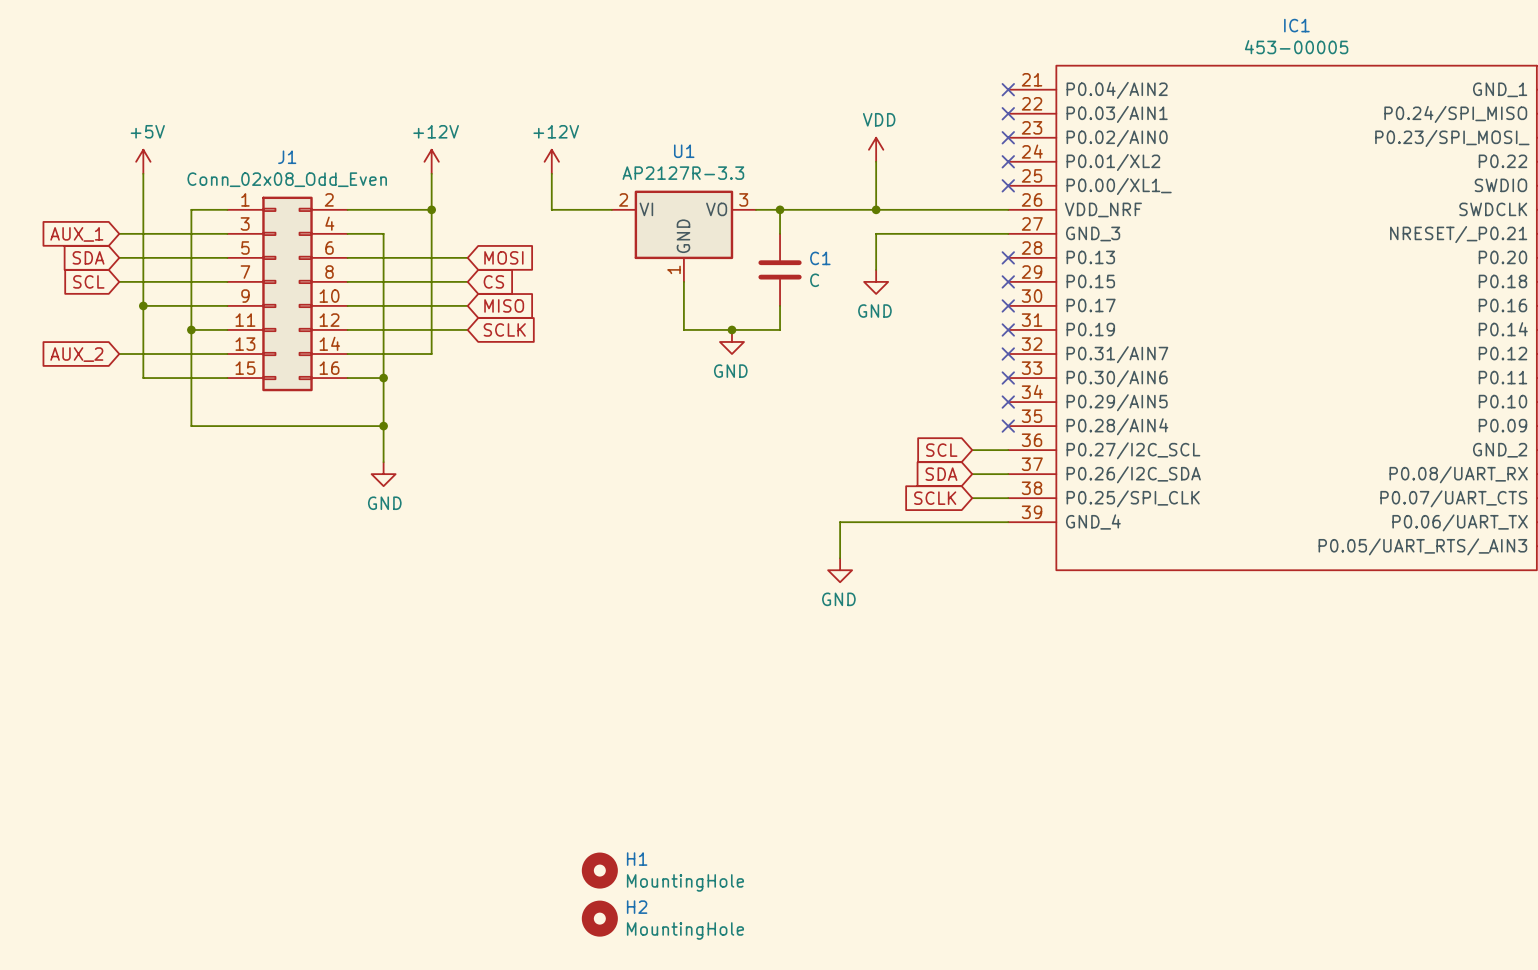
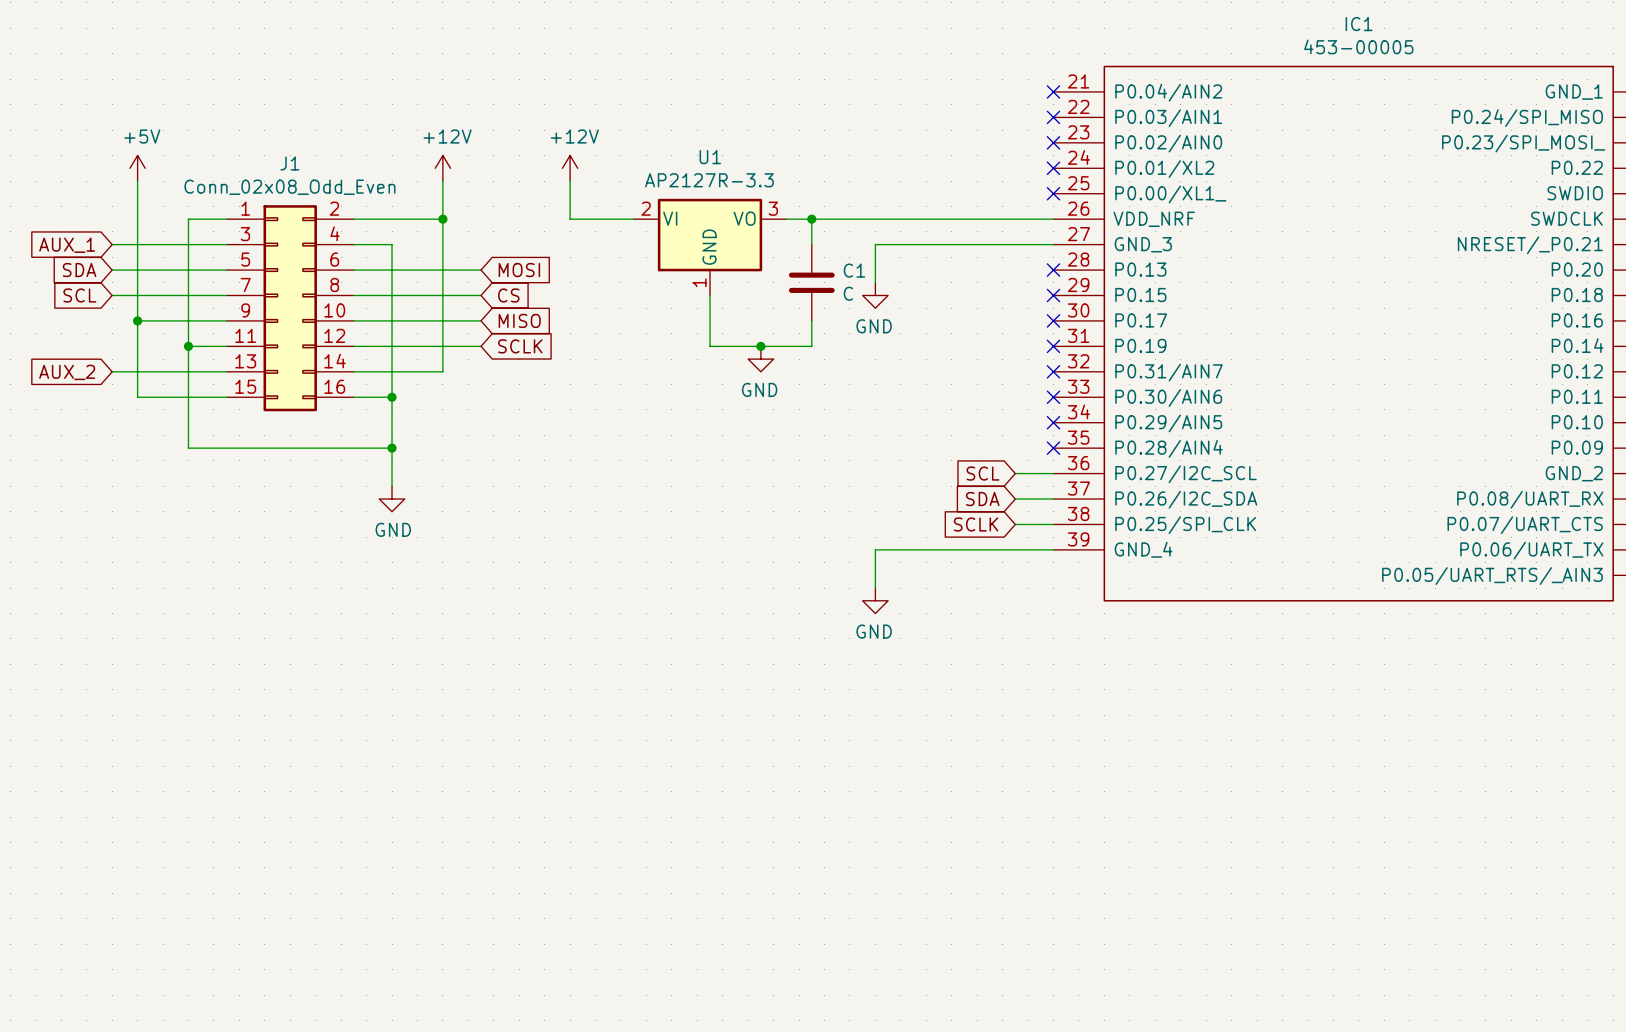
power symbol: VDD (876, 149) -> none
wire: (876, 161) (876, 209) -> none
junction: (876, 209) -> none
wire: (876, 233) (876, 269) -> (913, 244) (875, 244) (875, 282)
power symbol position: GND (876, 281) -> GND (875, 295)
H1: MountingHole (599, 870) -> none
H2: MountingHole (599, 918) -> none

